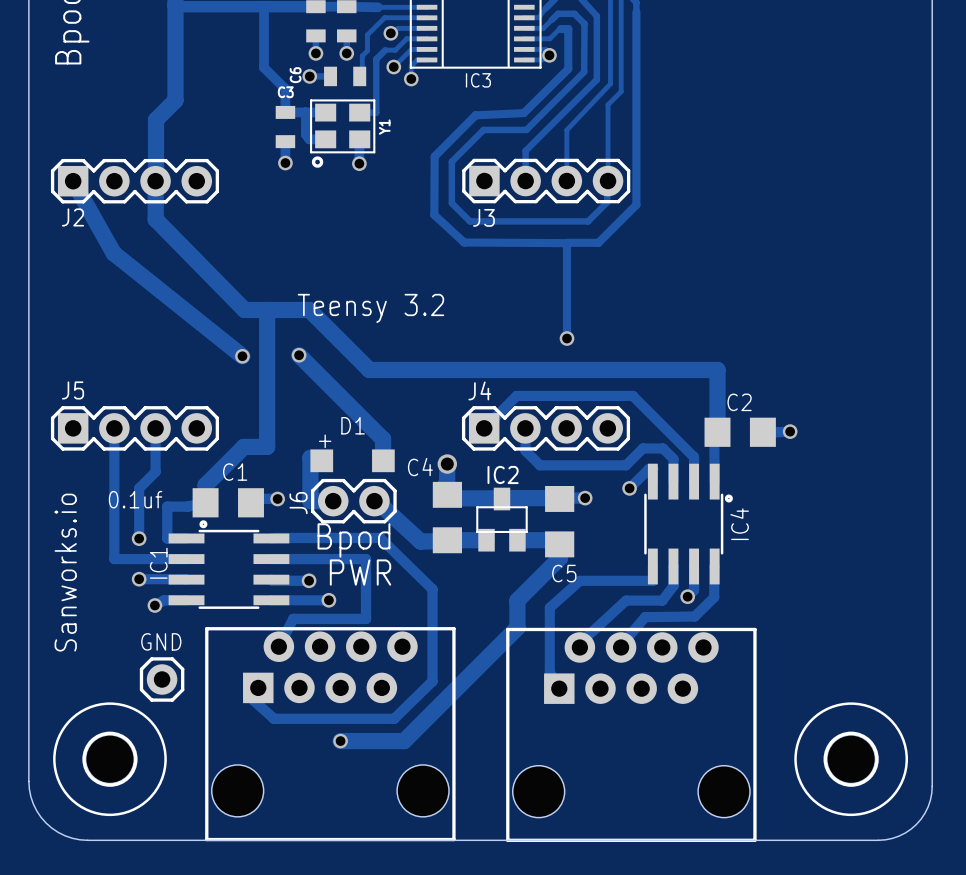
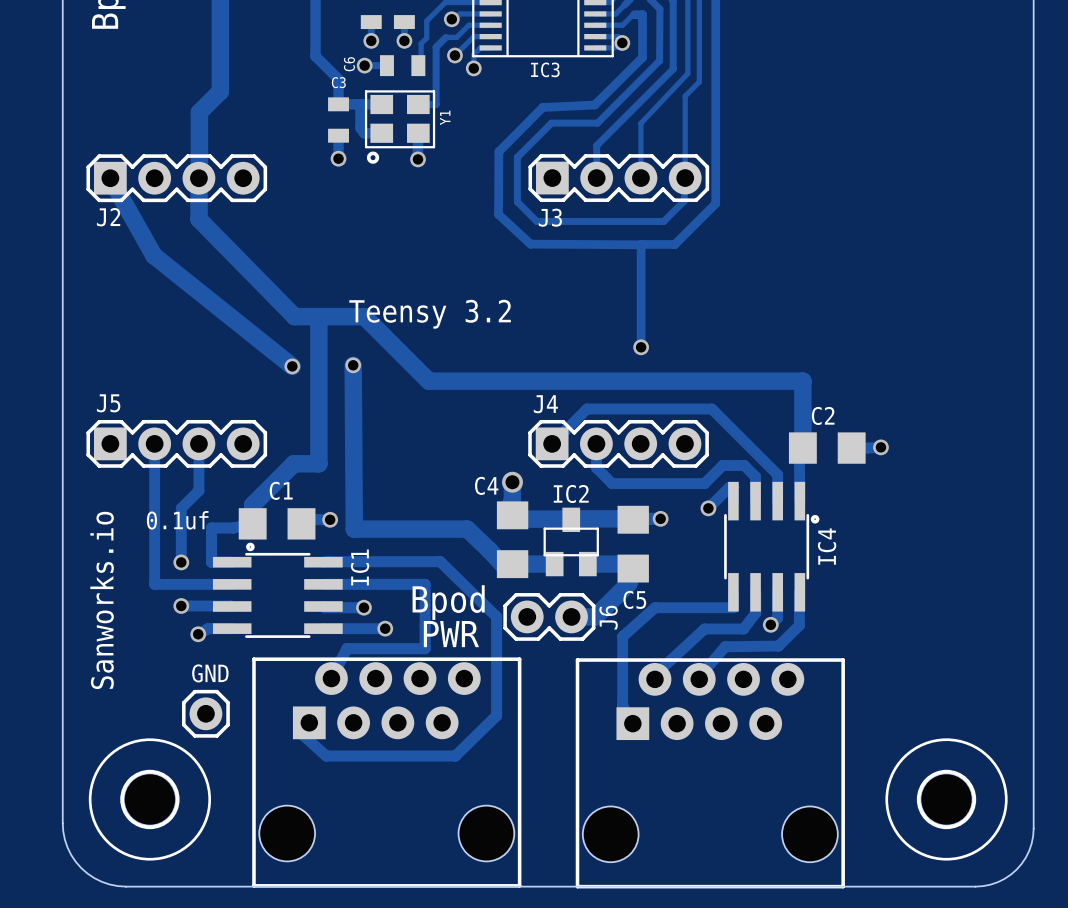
track: (299, 355) (383, 439) (383, 460) -> (353, 365) (354, 529) (467, 529) (502, 564)
text: + (325, 441) -> none
track: (321, 460) (321, 457) (310, 457) (310, 501) (333, 501) -> none
D1: (352, 460) -> none
J6 position: (353, 501) -> (549, 616)
track: (374, 501) (420, 541) (447, 540) -> none
J6 name position: J6 (298, 503) -> J6 (608, 617)
text position: Bpod (353, 540) -> Bpod (448, 602)
track: (559, 544) (559, 558) (517, 600) (517, 627) (404, 741) (340, 741) -> (633, 568) (628, 572) (628, 583) (595, 616) (571, 616)
IC1 name position: IC1 (158, 563) -> IC1 (360, 567)
text position: PWR (360, 572) -> PWR (451, 634)
via: (340, 741) -> none

